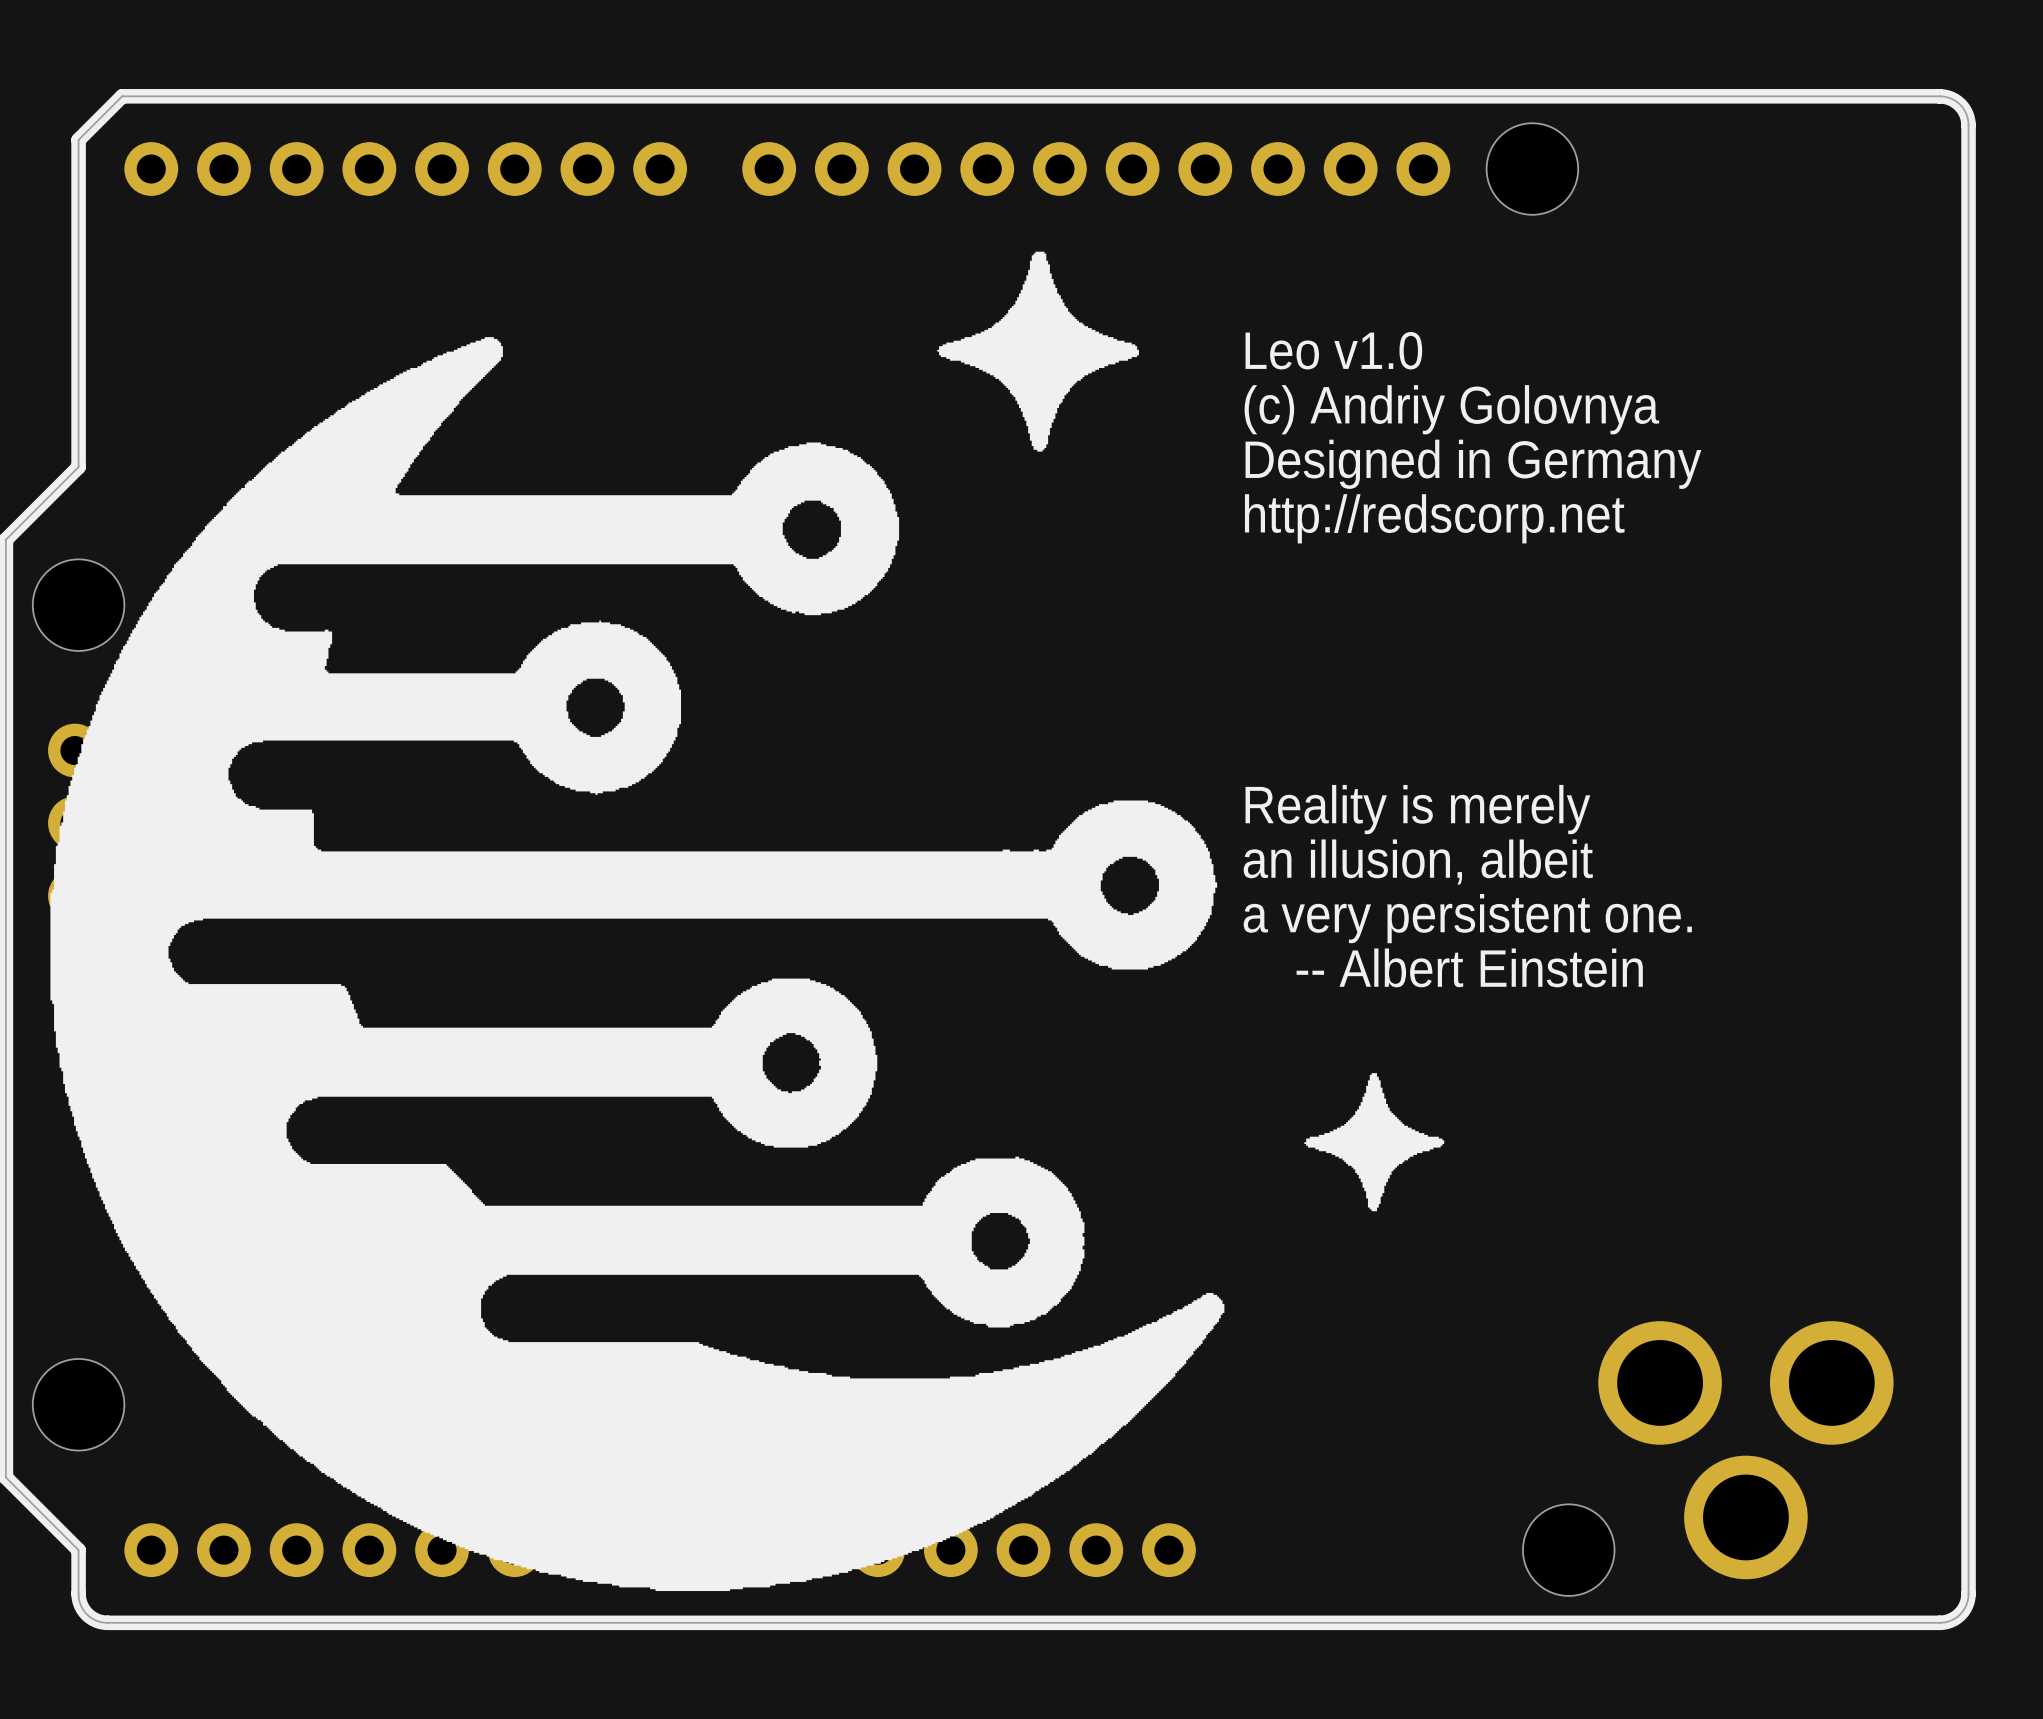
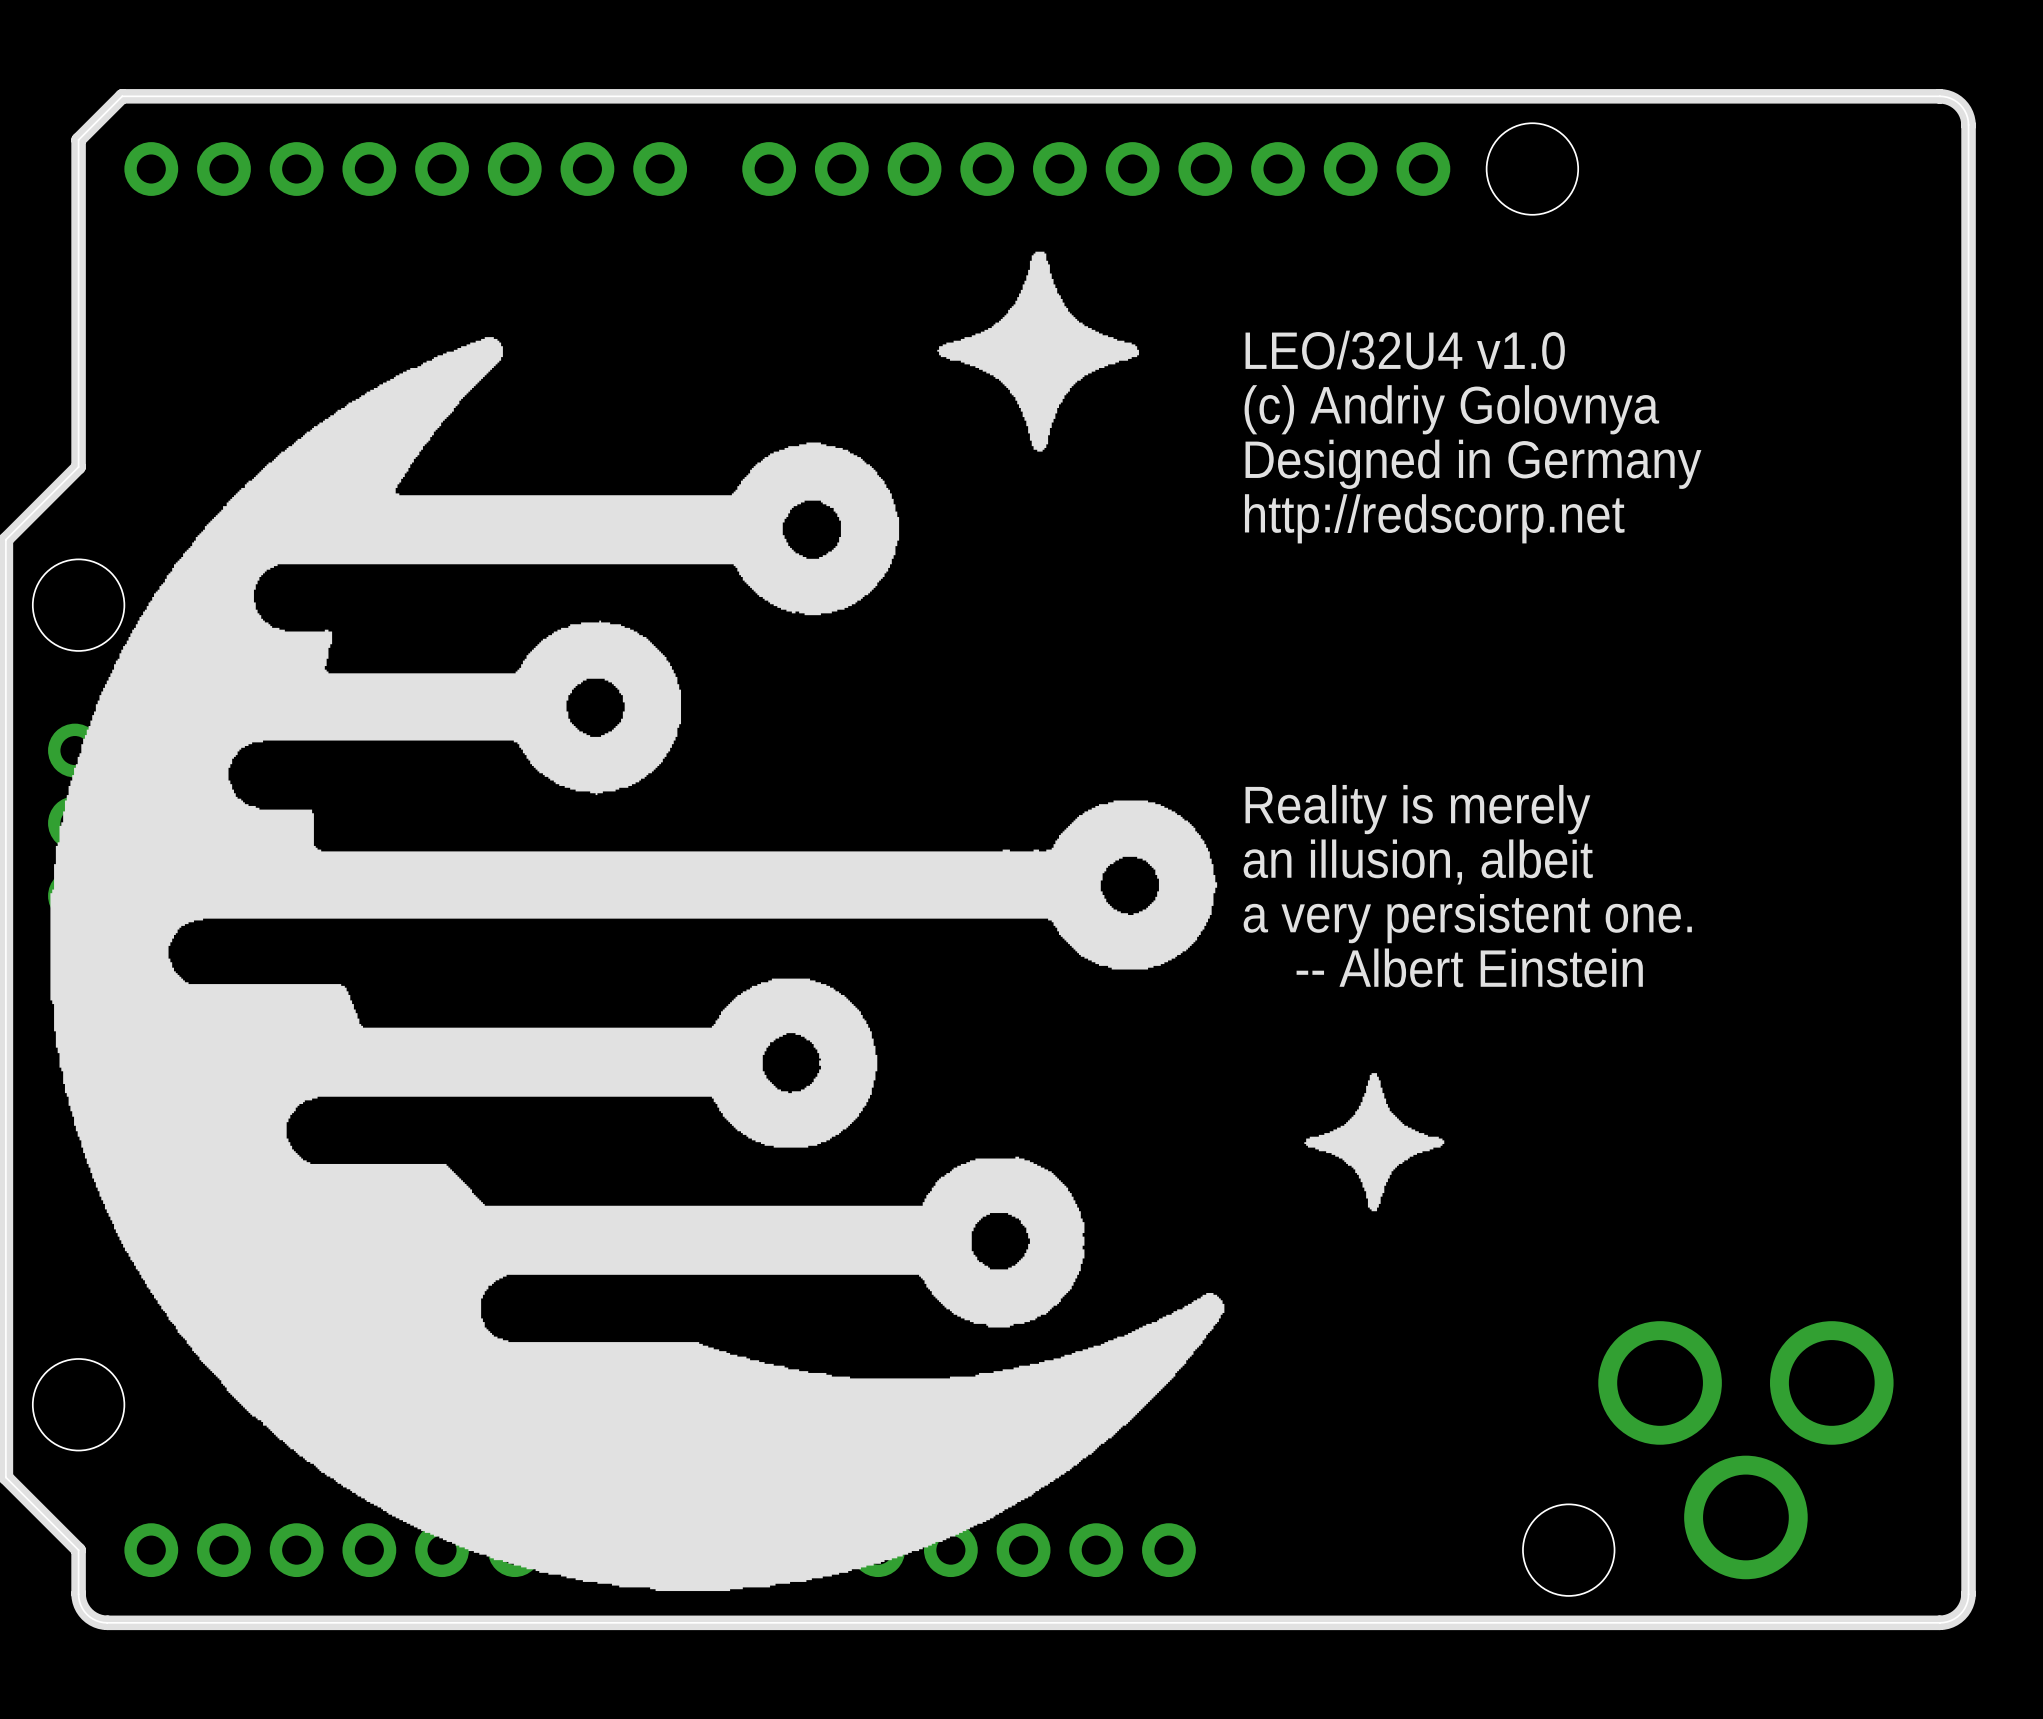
text: Leo v1.0 (1333, 350) -> LEO/32U4 v1.0 (1405, 350)

